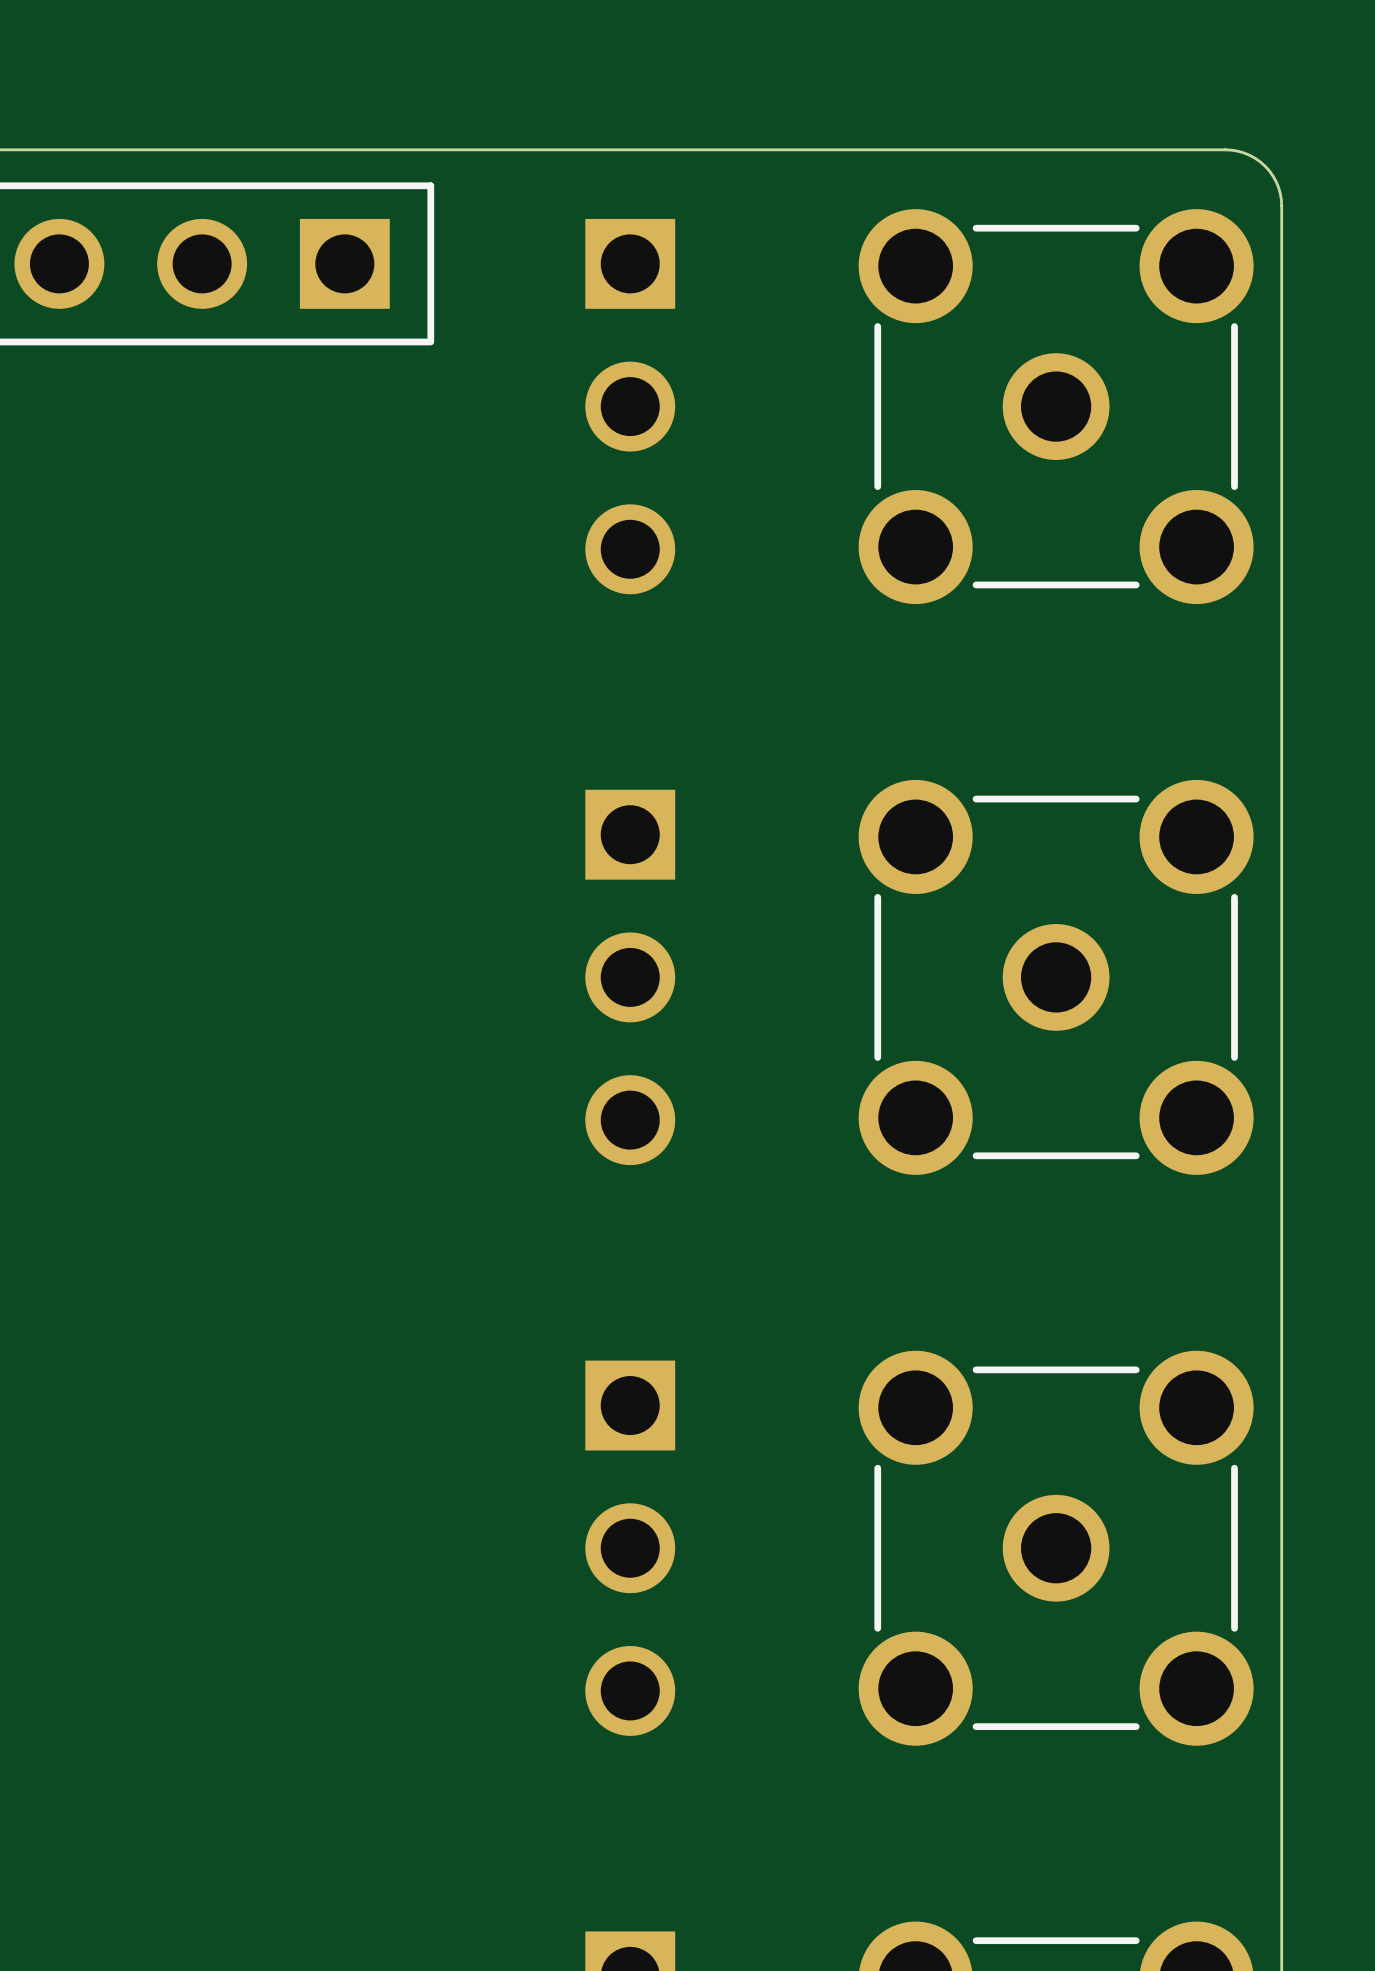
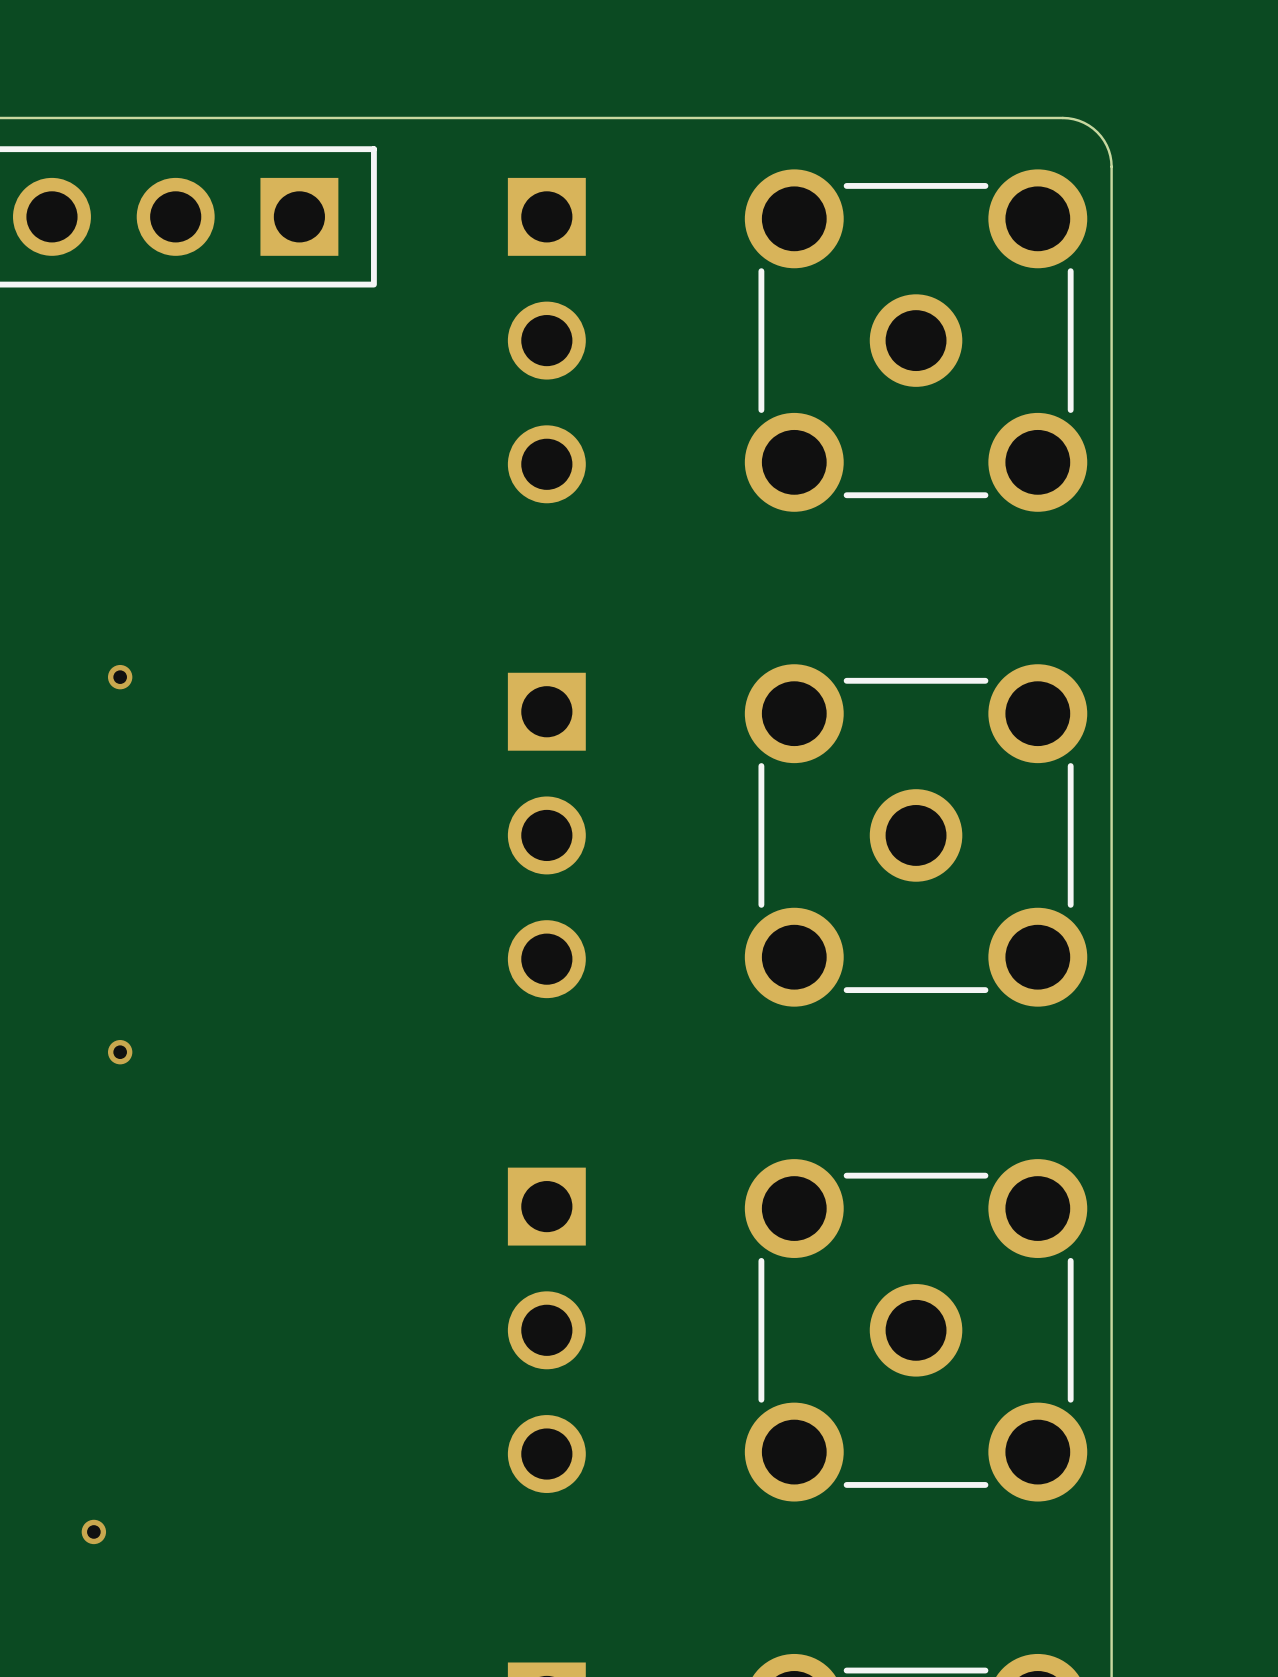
via: none -> (120, 677)
via: none -> (120, 1052)
via: none -> (93, 1531)

